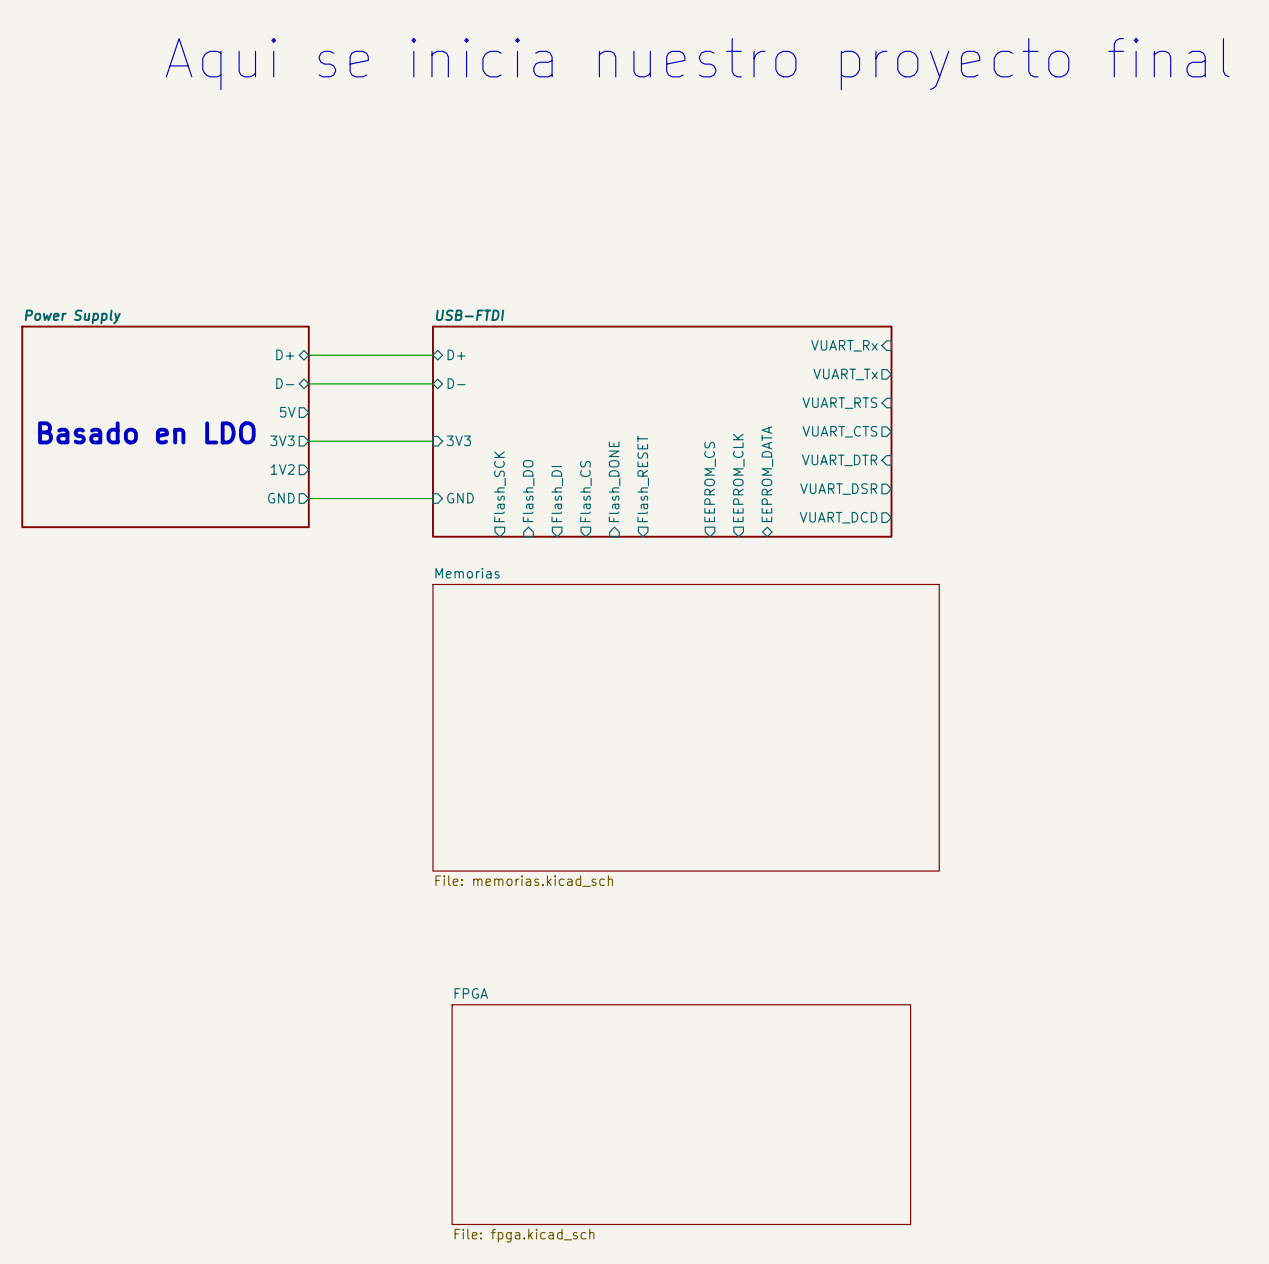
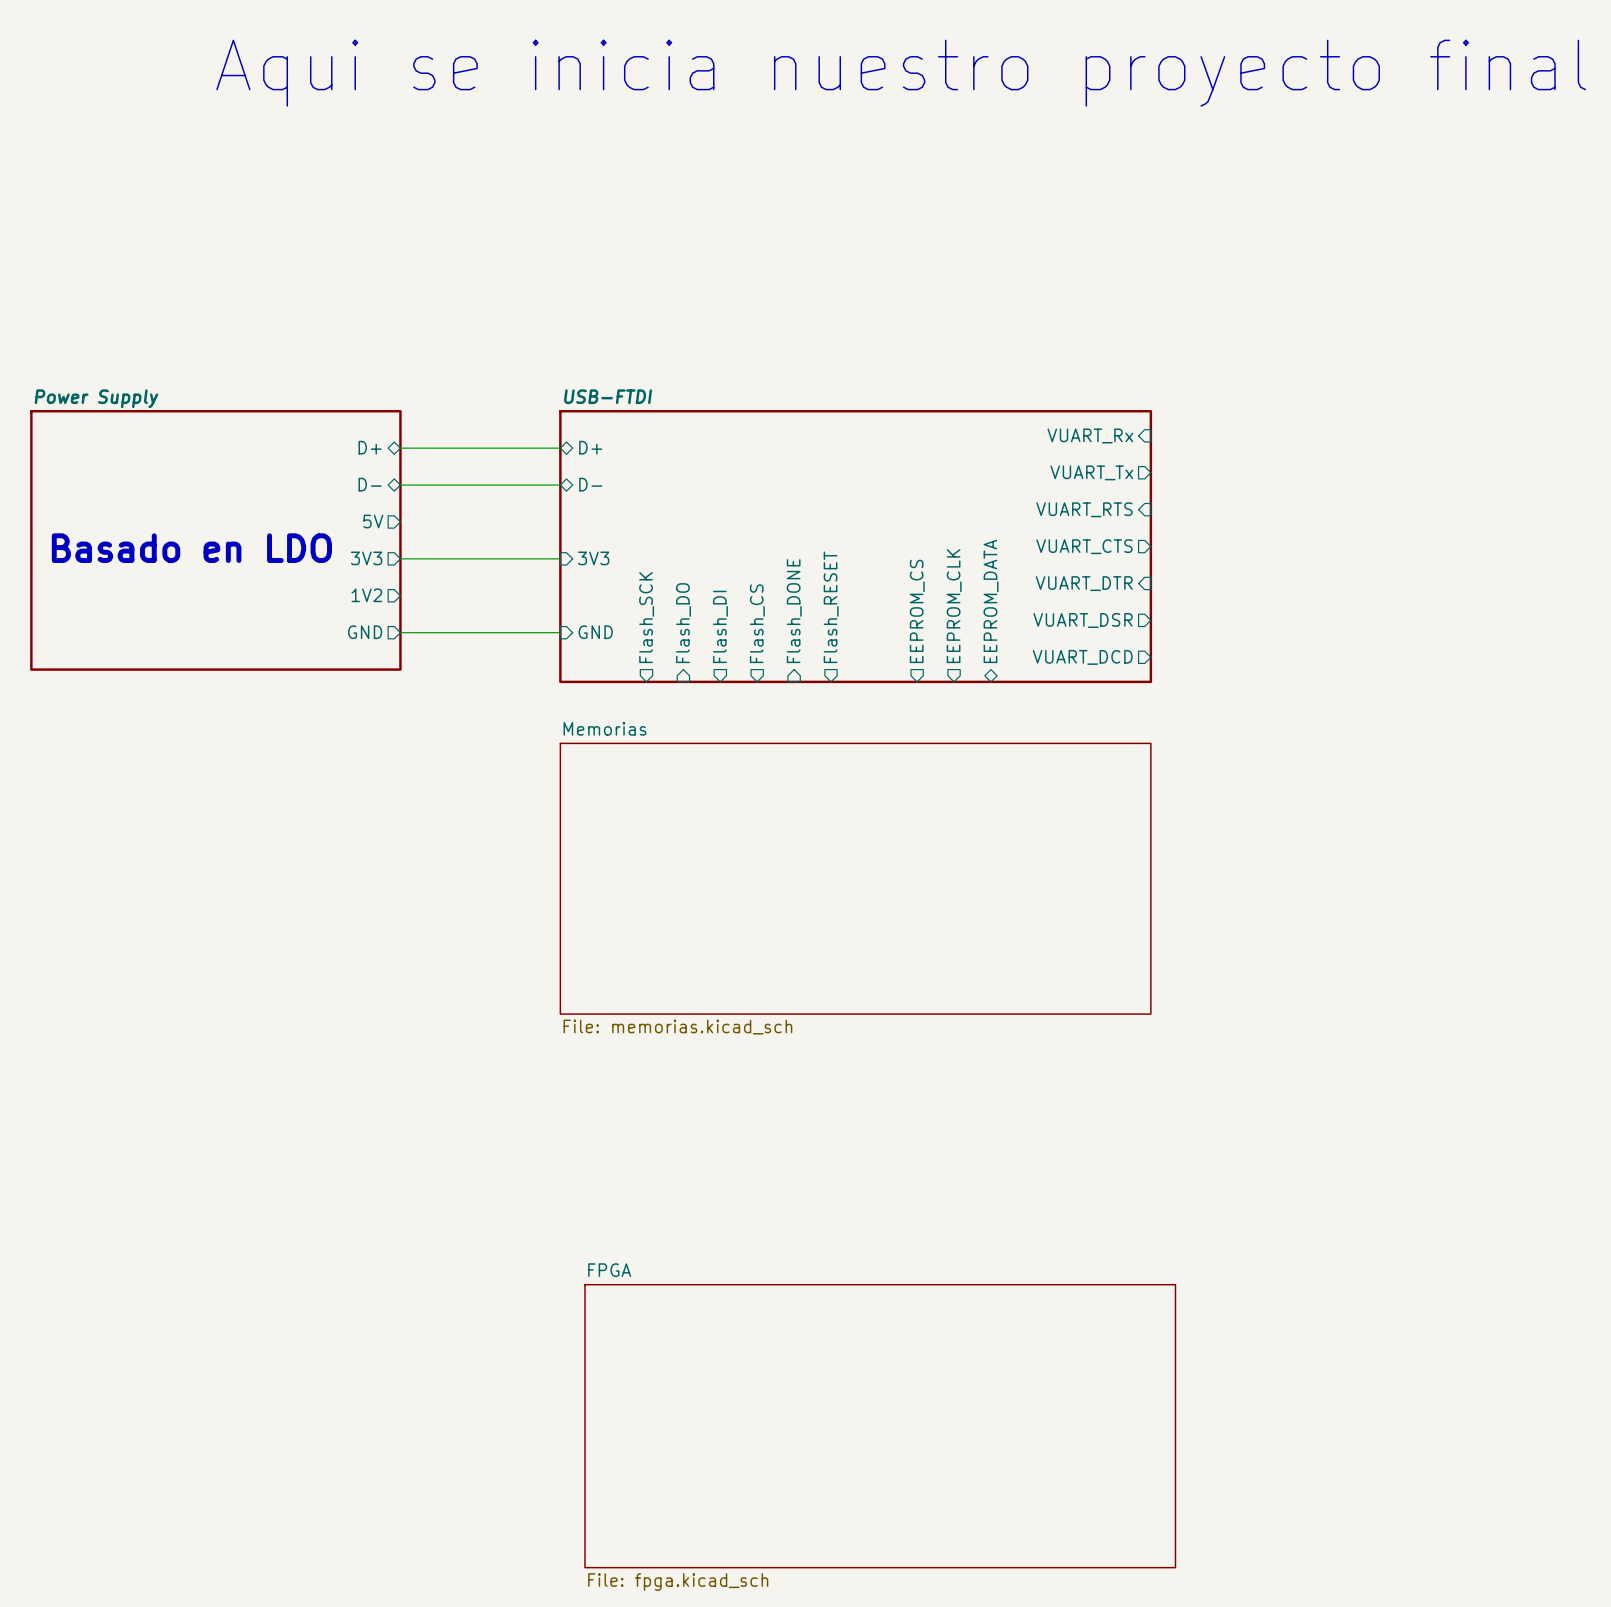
sheet Memorias: none -> File: memorias.kicad_sch (855, 878)
sheet Memorias: File: memorias.kicad_sch (686, 727) -> none

